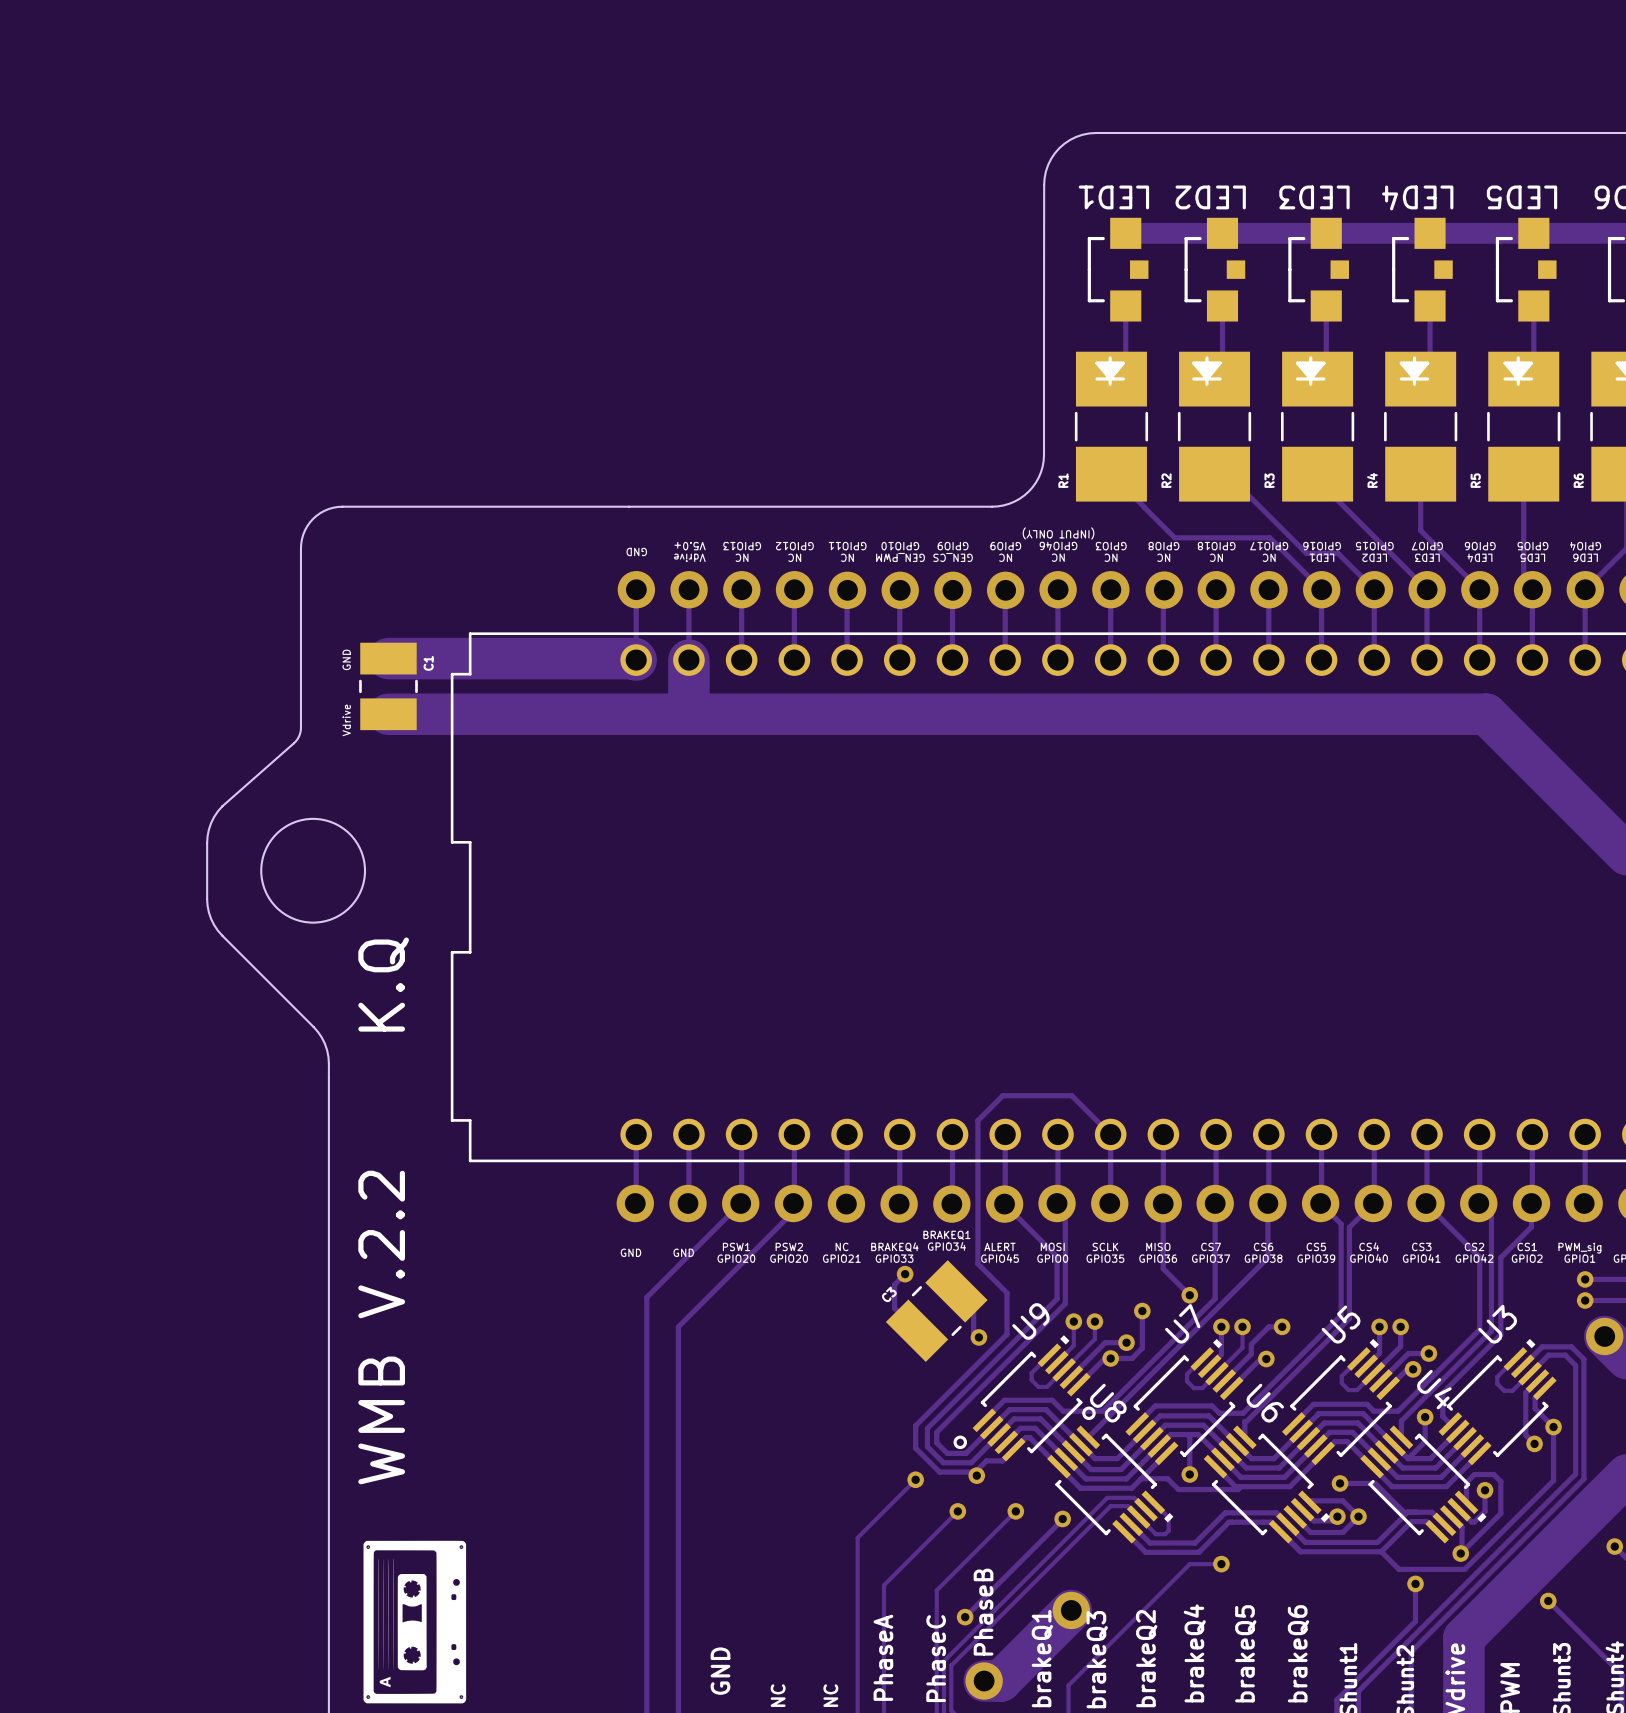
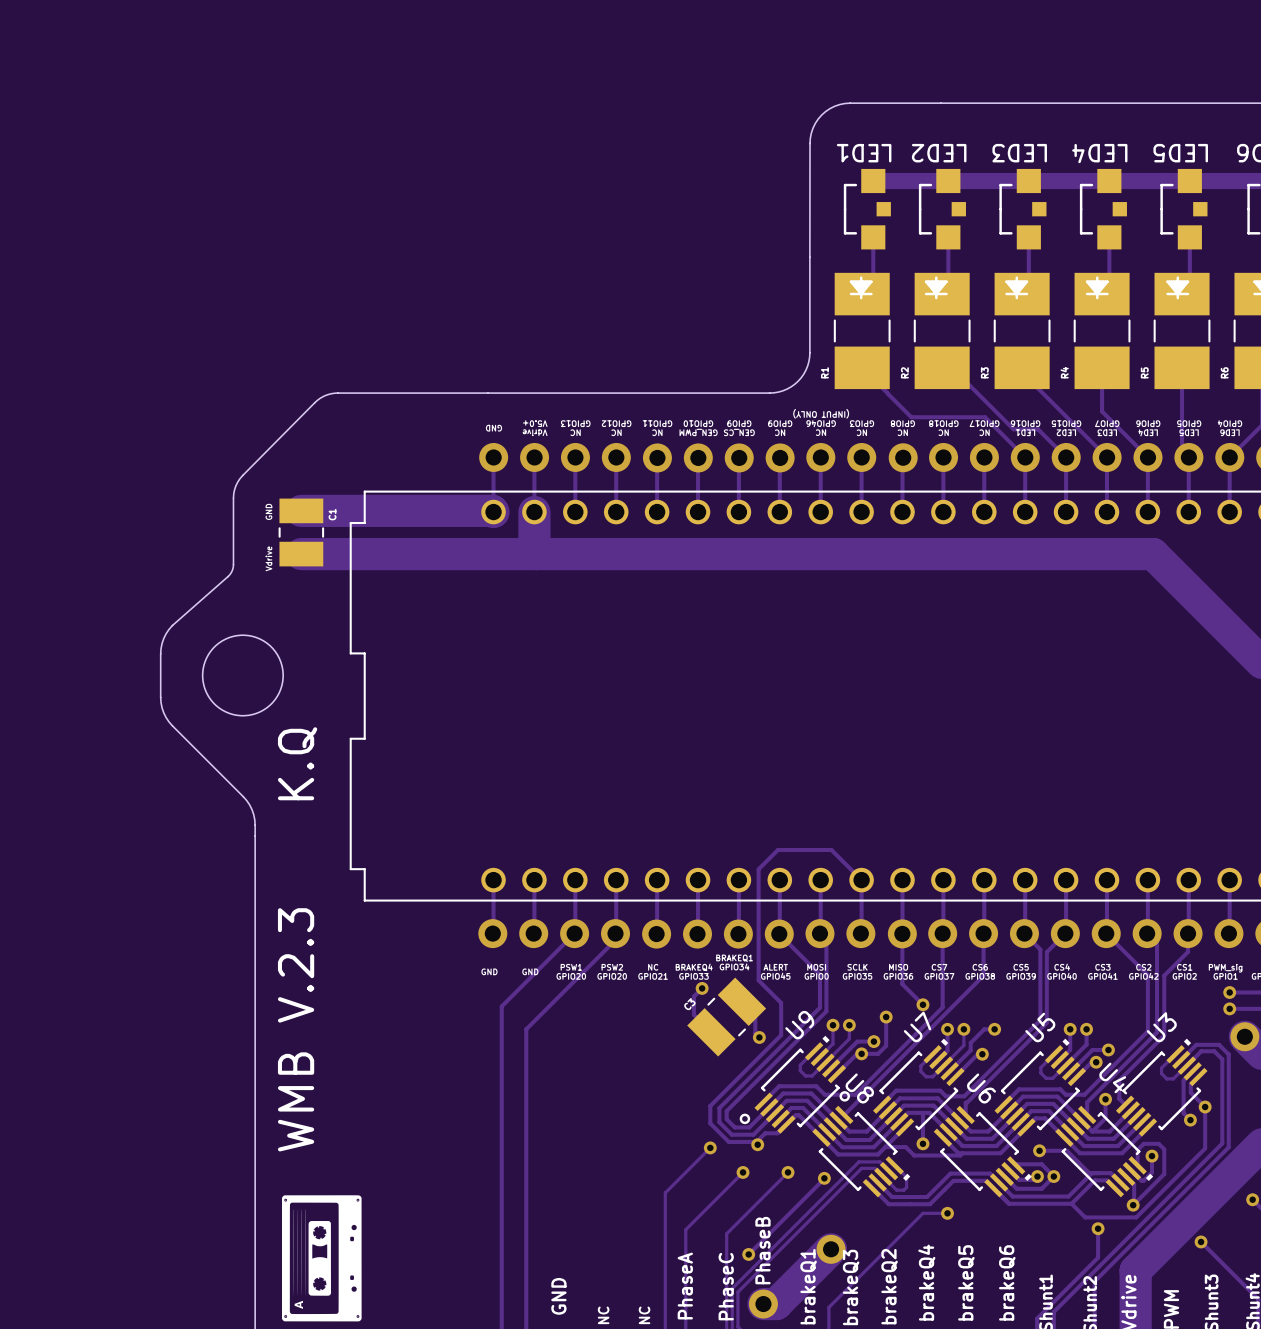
board edge: (435, 506) (337, 506) (324, 510) (313, 518) (305, 530) (301, 543) (300, 642) -> (337, 393) (325, 395) (314, 402) (240, 478) (235, 485) (233, 498)
text: WMB V.2.2 K.Q (383, 1210) -> WMB V.2.3 K.Q (297, 939)

